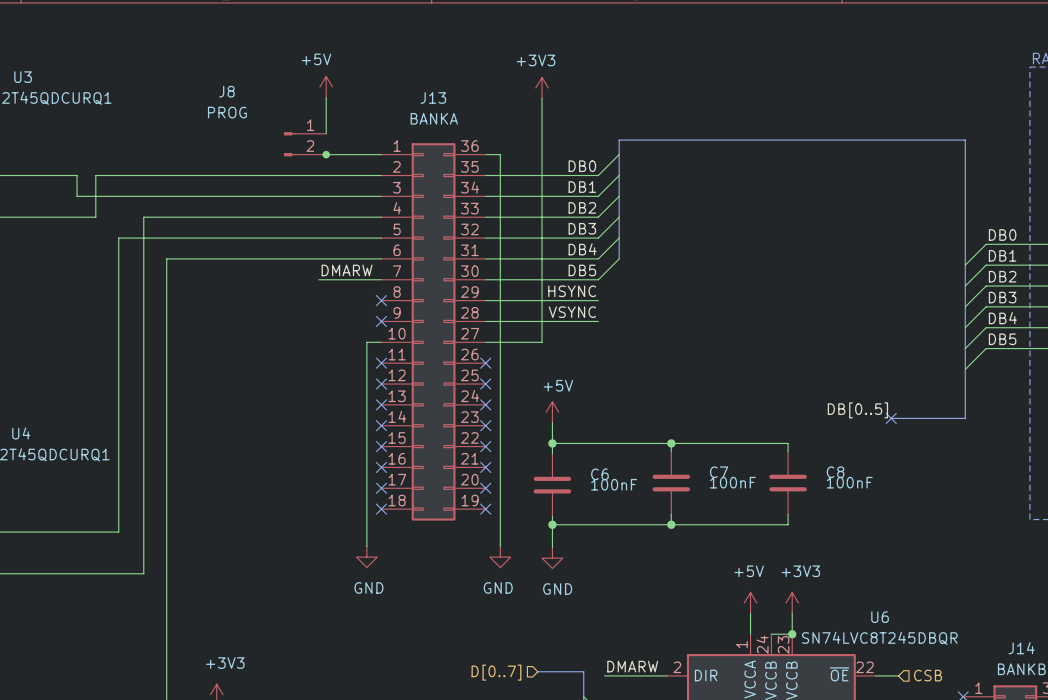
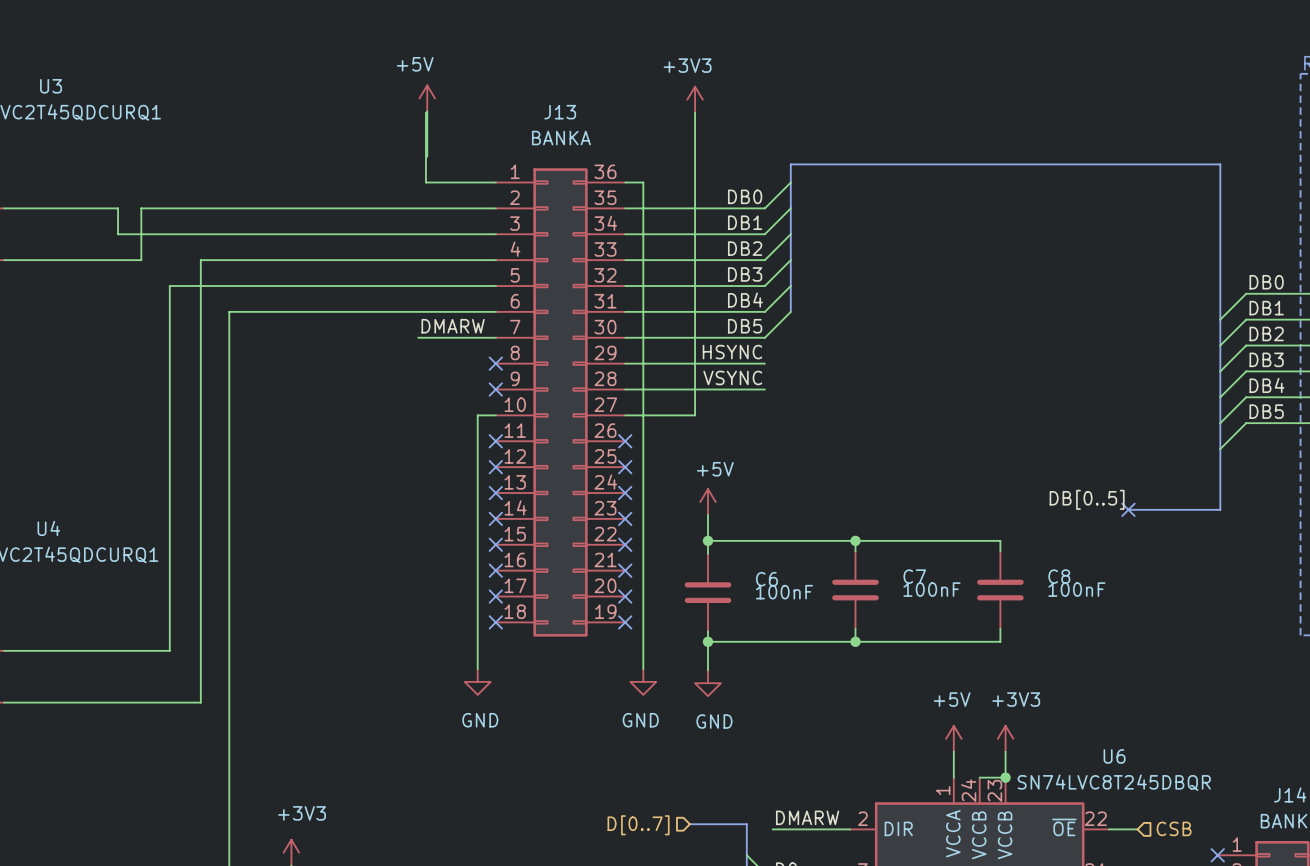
wire: none -> (425, 112) (425, 182)
J8: PROG (305, 144) -> none
junction: (326, 154) -> none

